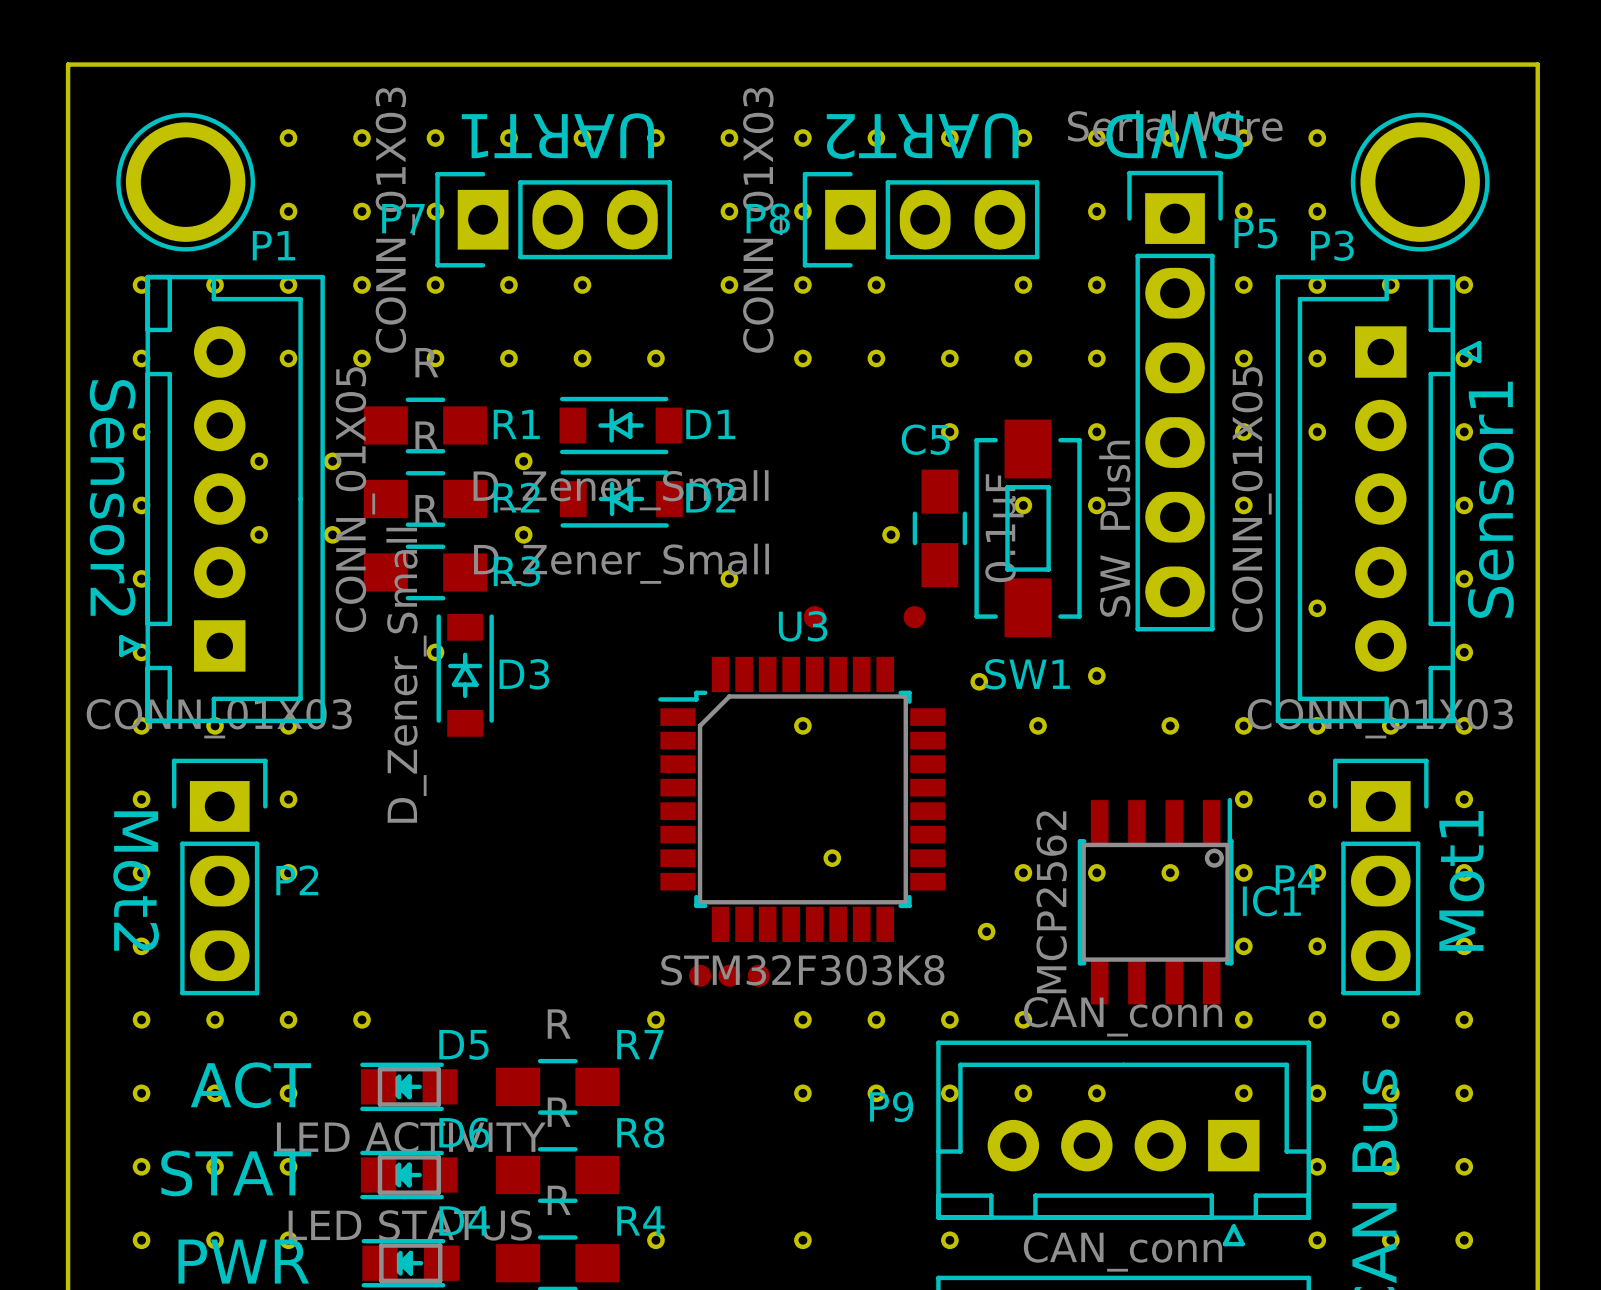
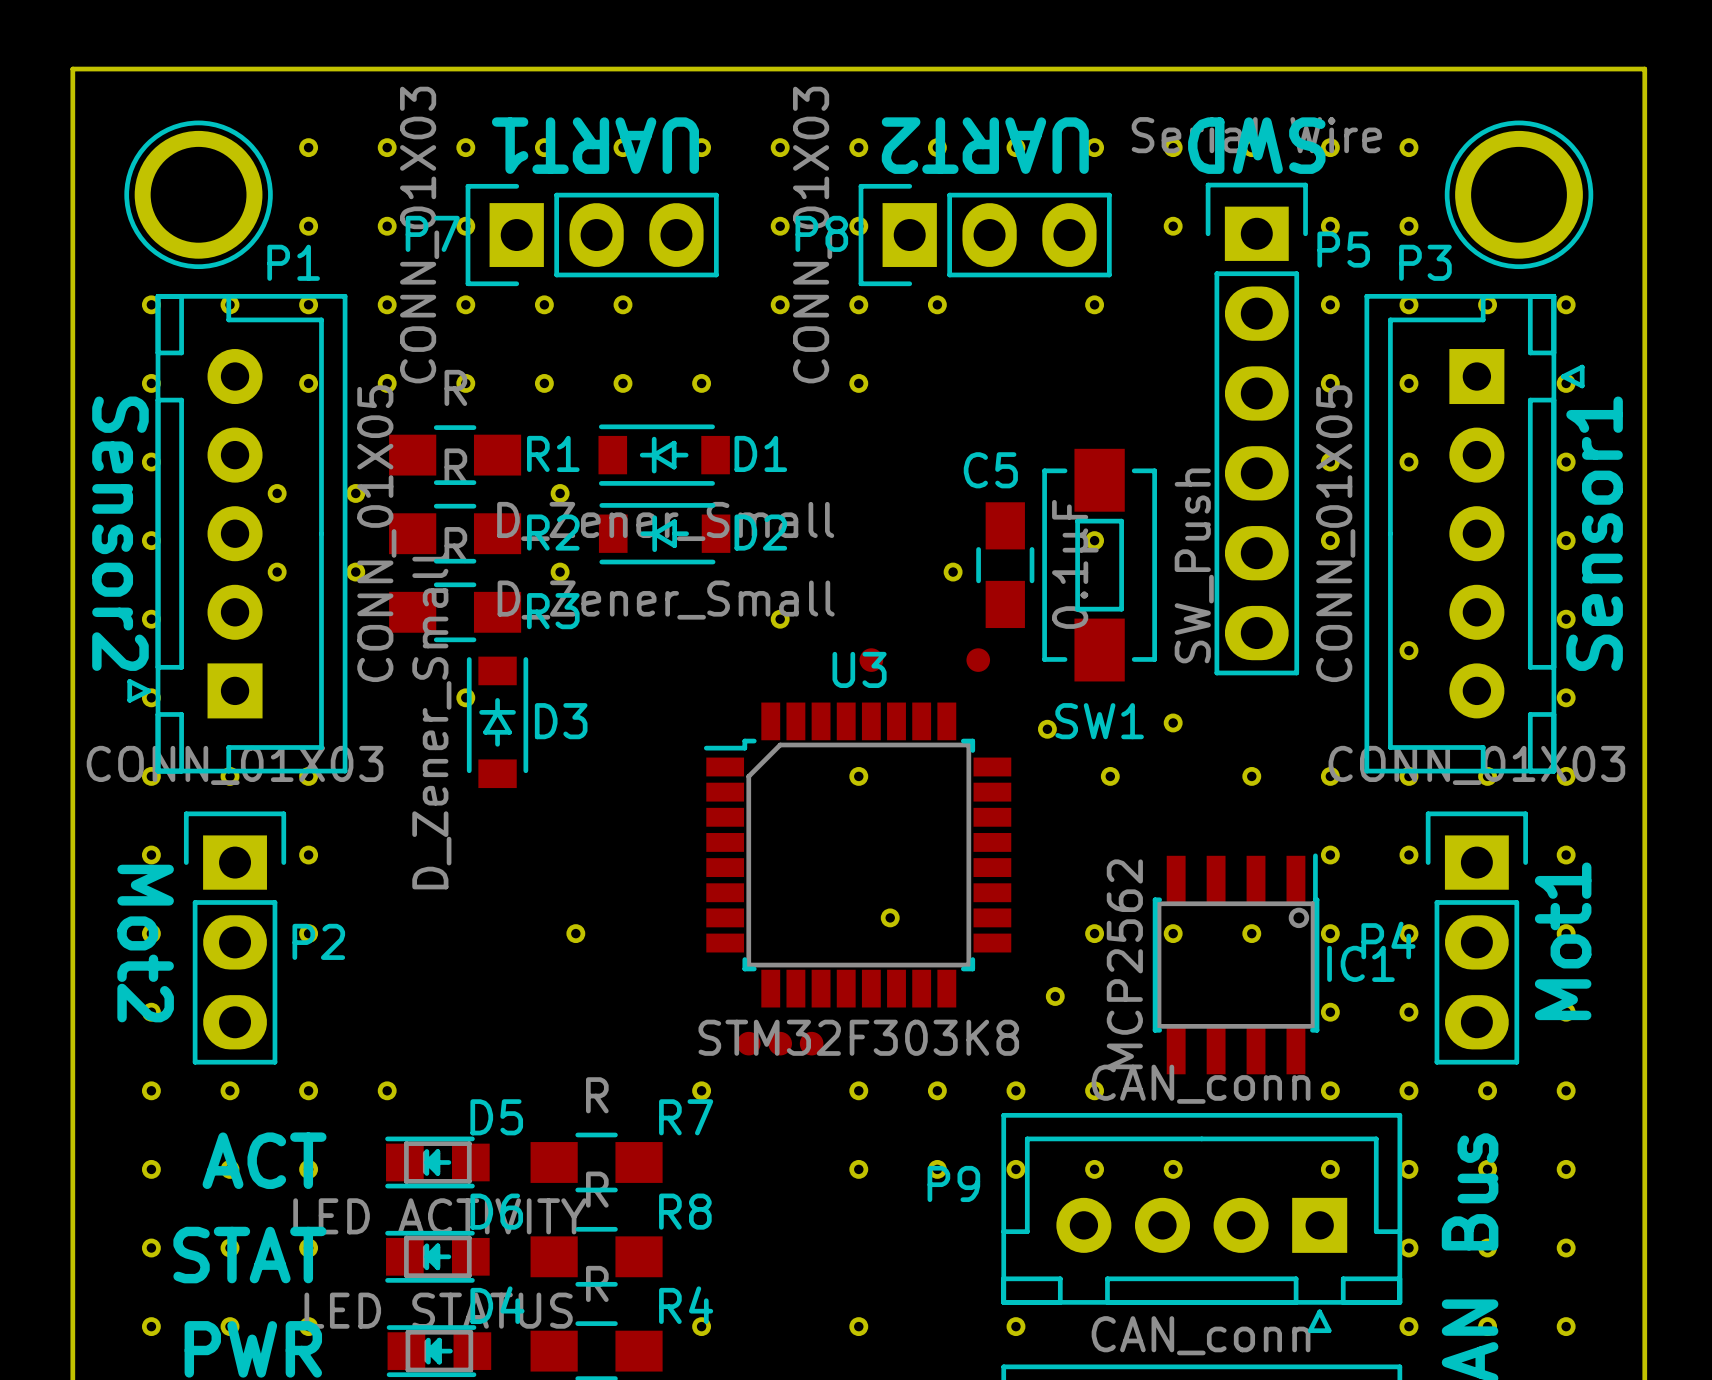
part: (1096, 285) -> none
part: (876, 358) -> none
part: (949, 358) -> none
part: (1023, 358) -> none
part: (1096, 358) -> none
part: (949, 431) -> none
part: (1096, 431) -> none
part: (1096, 505) -> none
part: none -> (575, 933)

